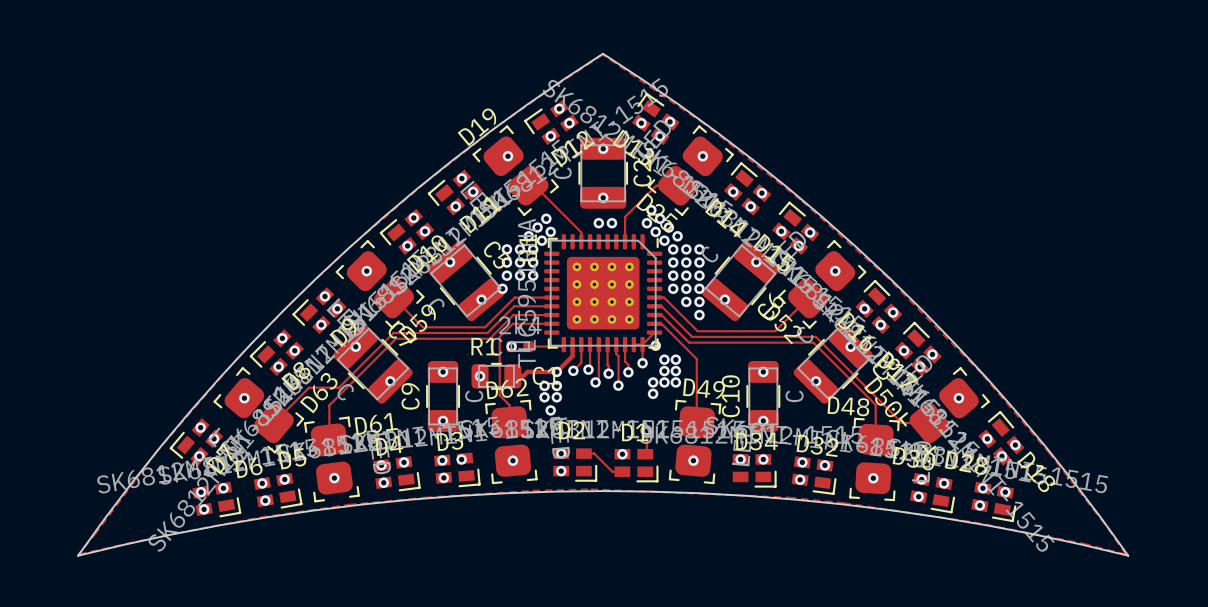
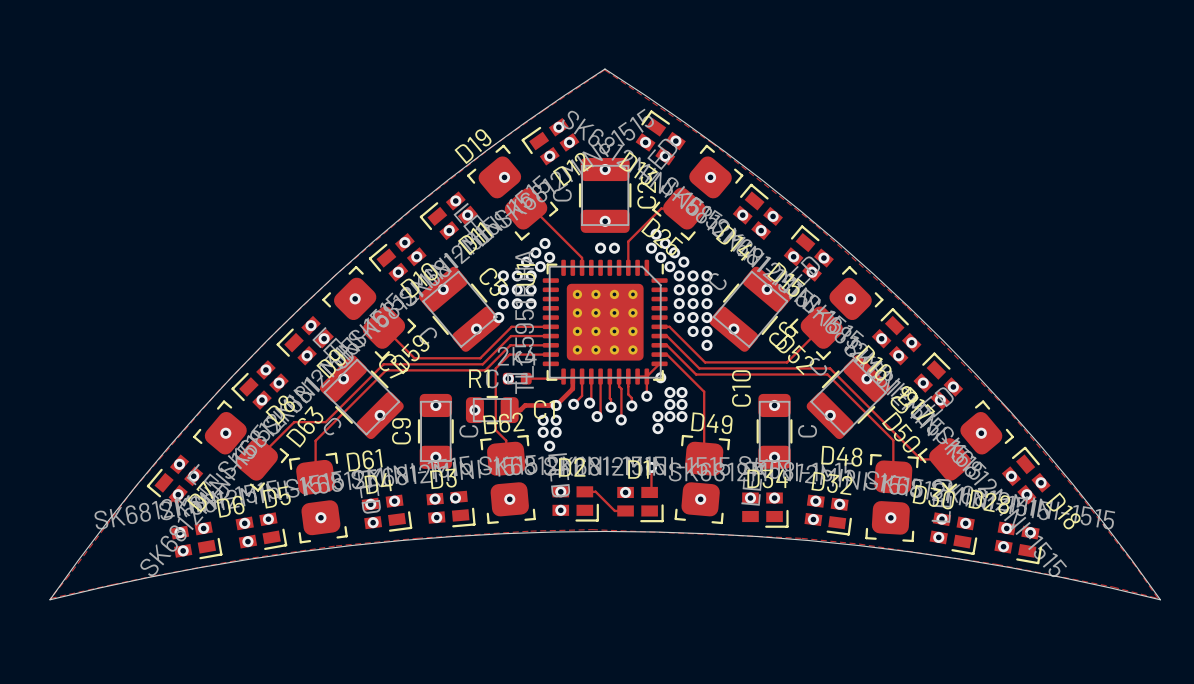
C10 name position: C10 (730, 396) -> C10 (741, 388)
D48 name position: D48 (848, 406) -> D48 (841, 456)

